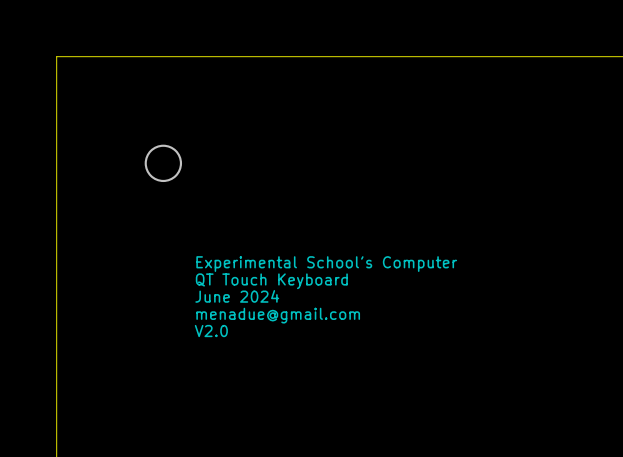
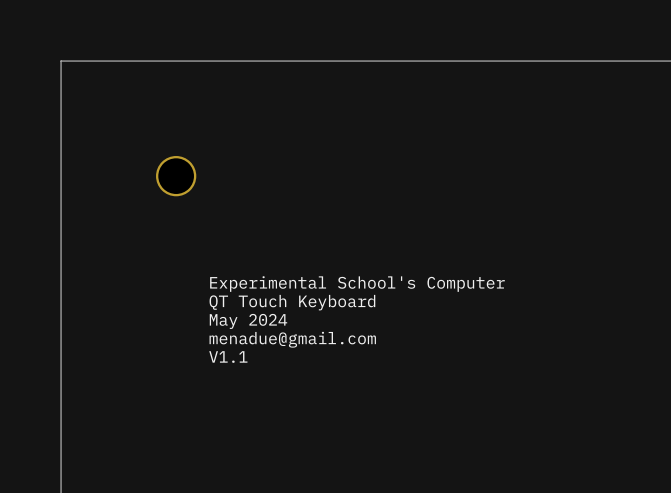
text: June 2024 (237, 296) -> May 2024 (248, 321)
text: V2.0 (211, 331) -> V1.1 (228, 357)

